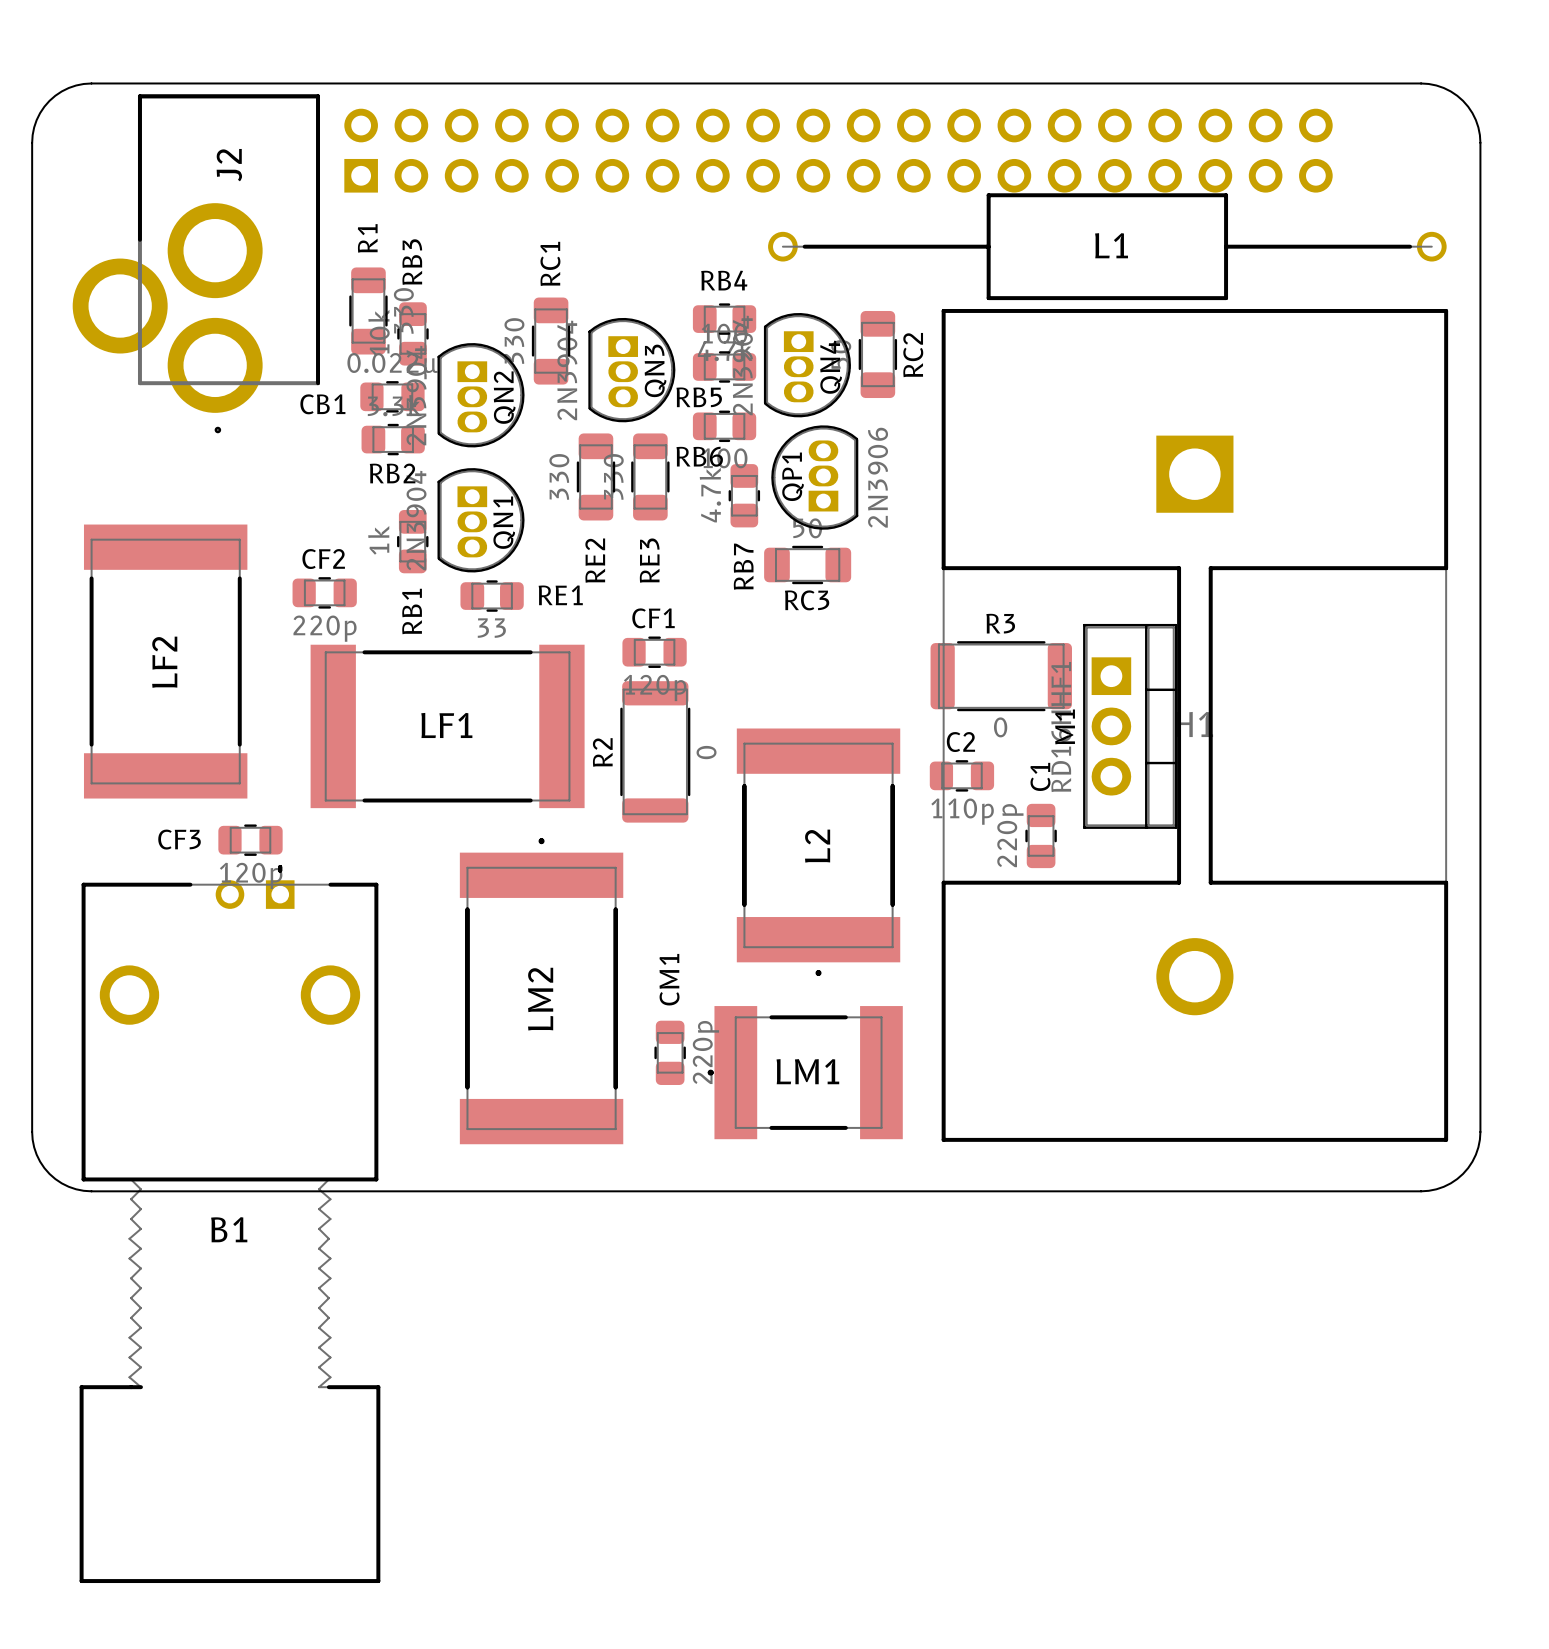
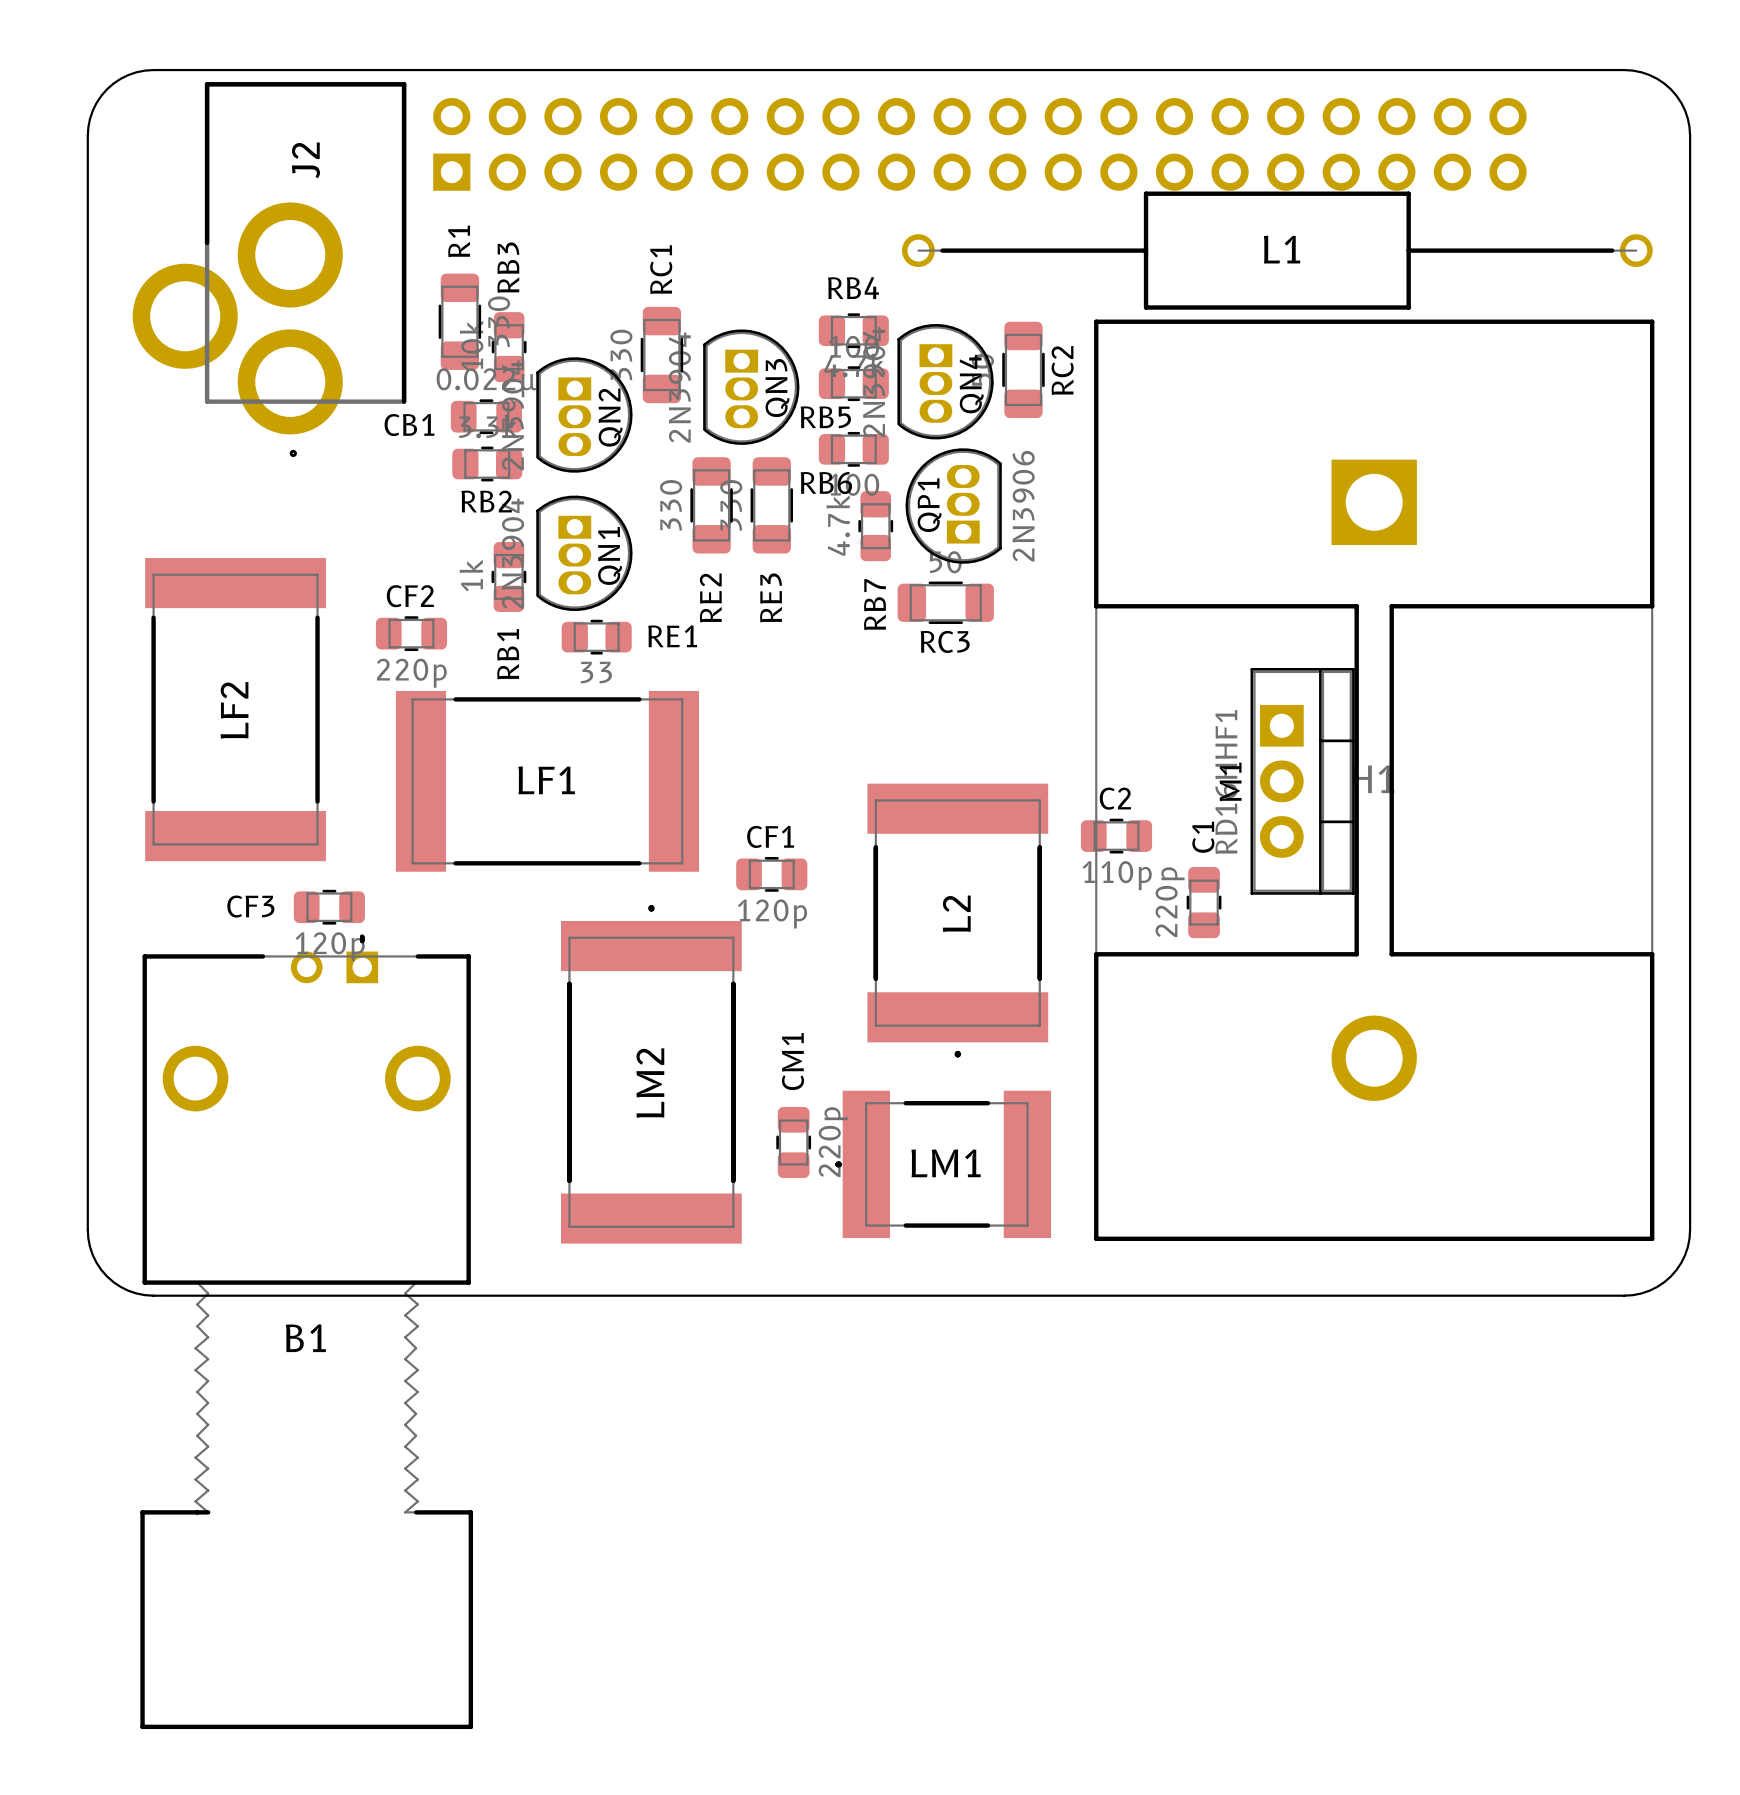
CF1 position: (654, 652) -> (771, 874)
R3: 0 (1001, 676) -> none
R2: 0 (655, 751) -> none

